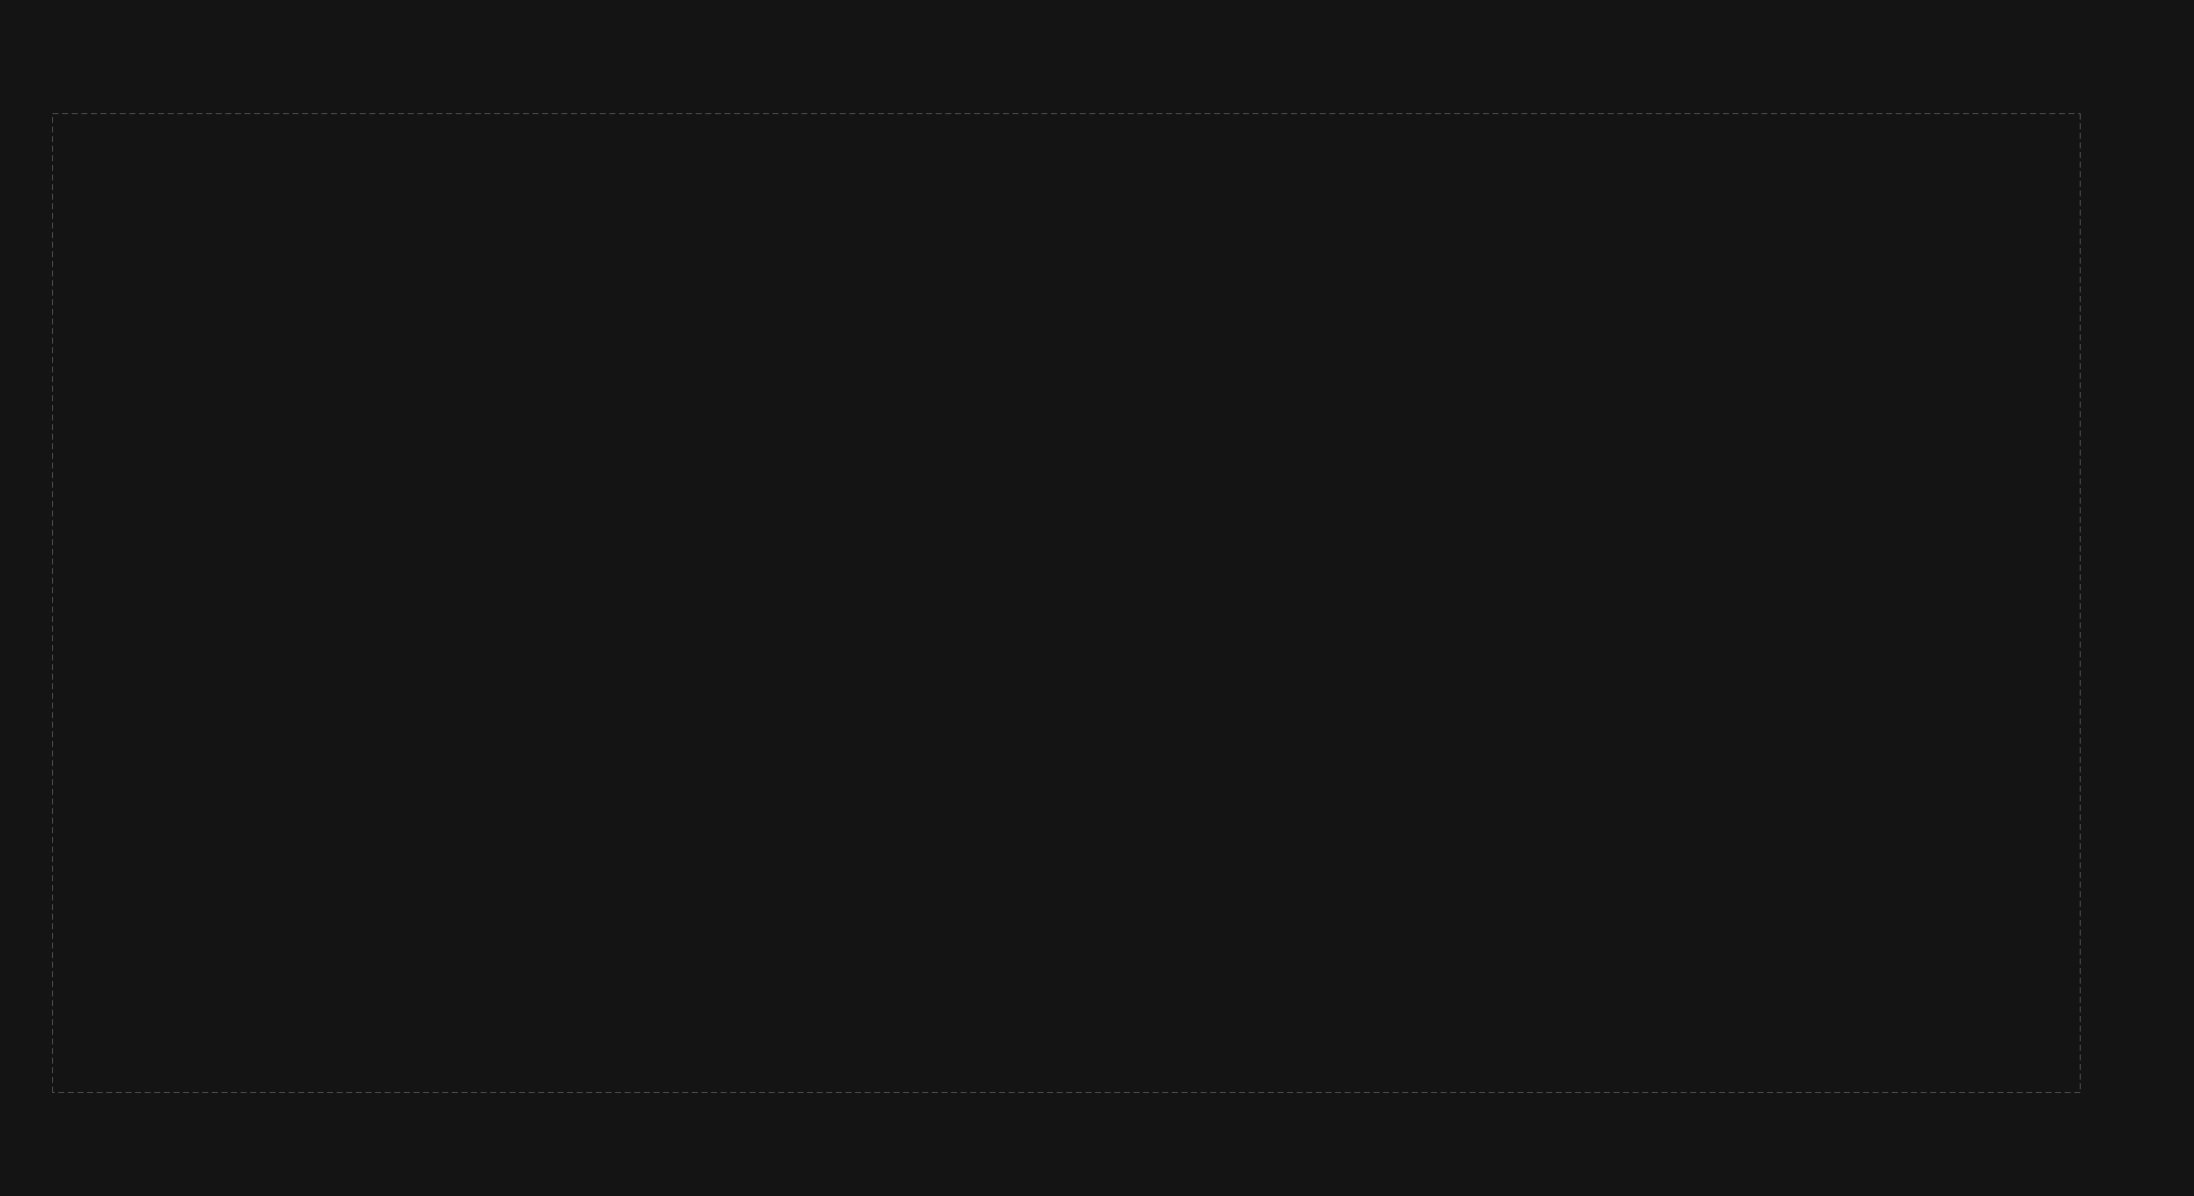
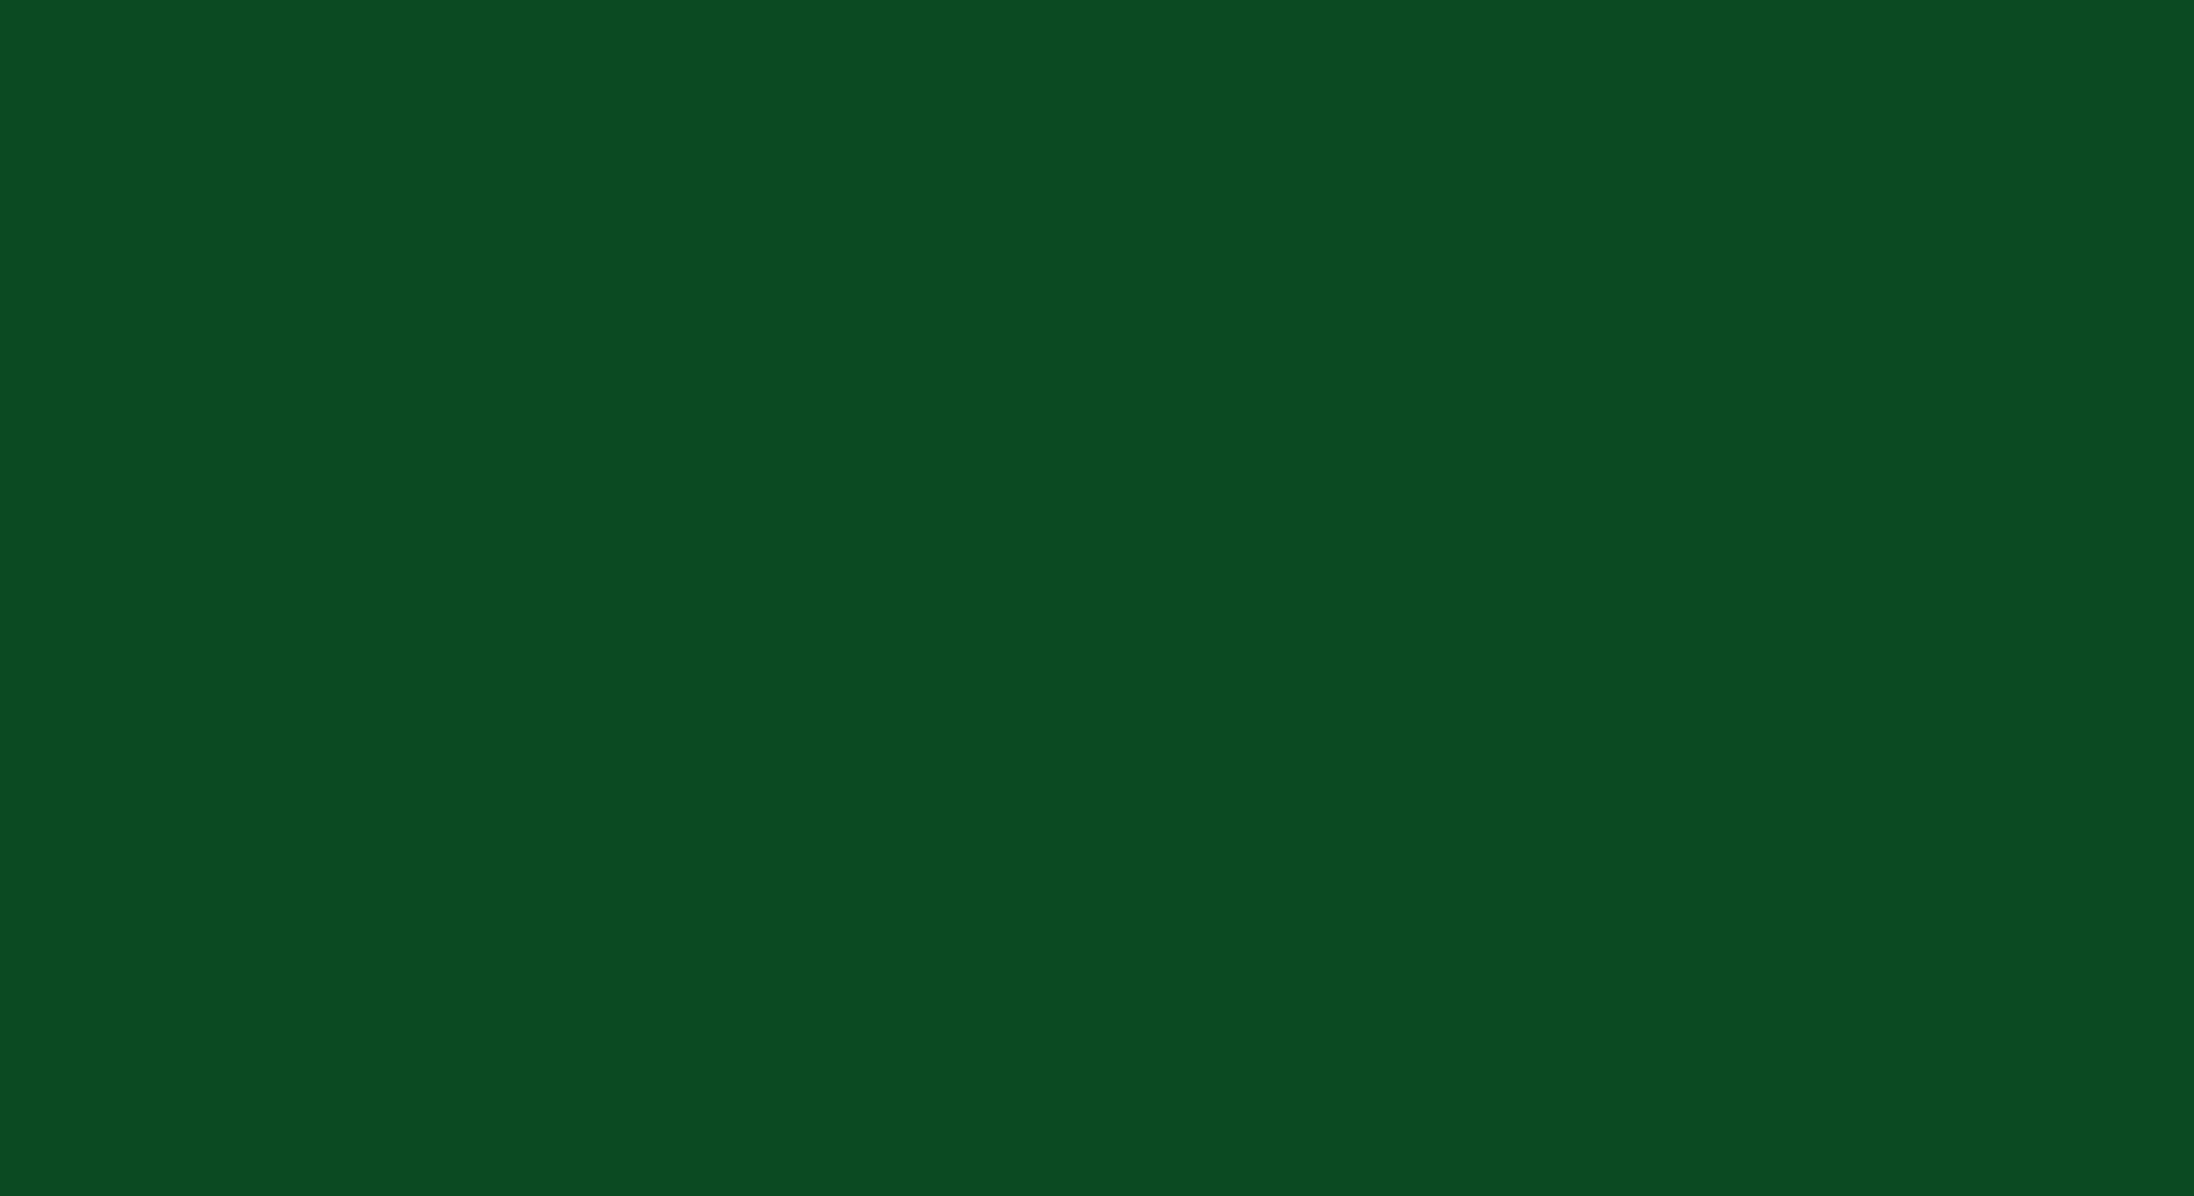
zone outline: (52, 113) (52, 1092) (2080, 1092) (2080, 113) (52, 113) -> none

